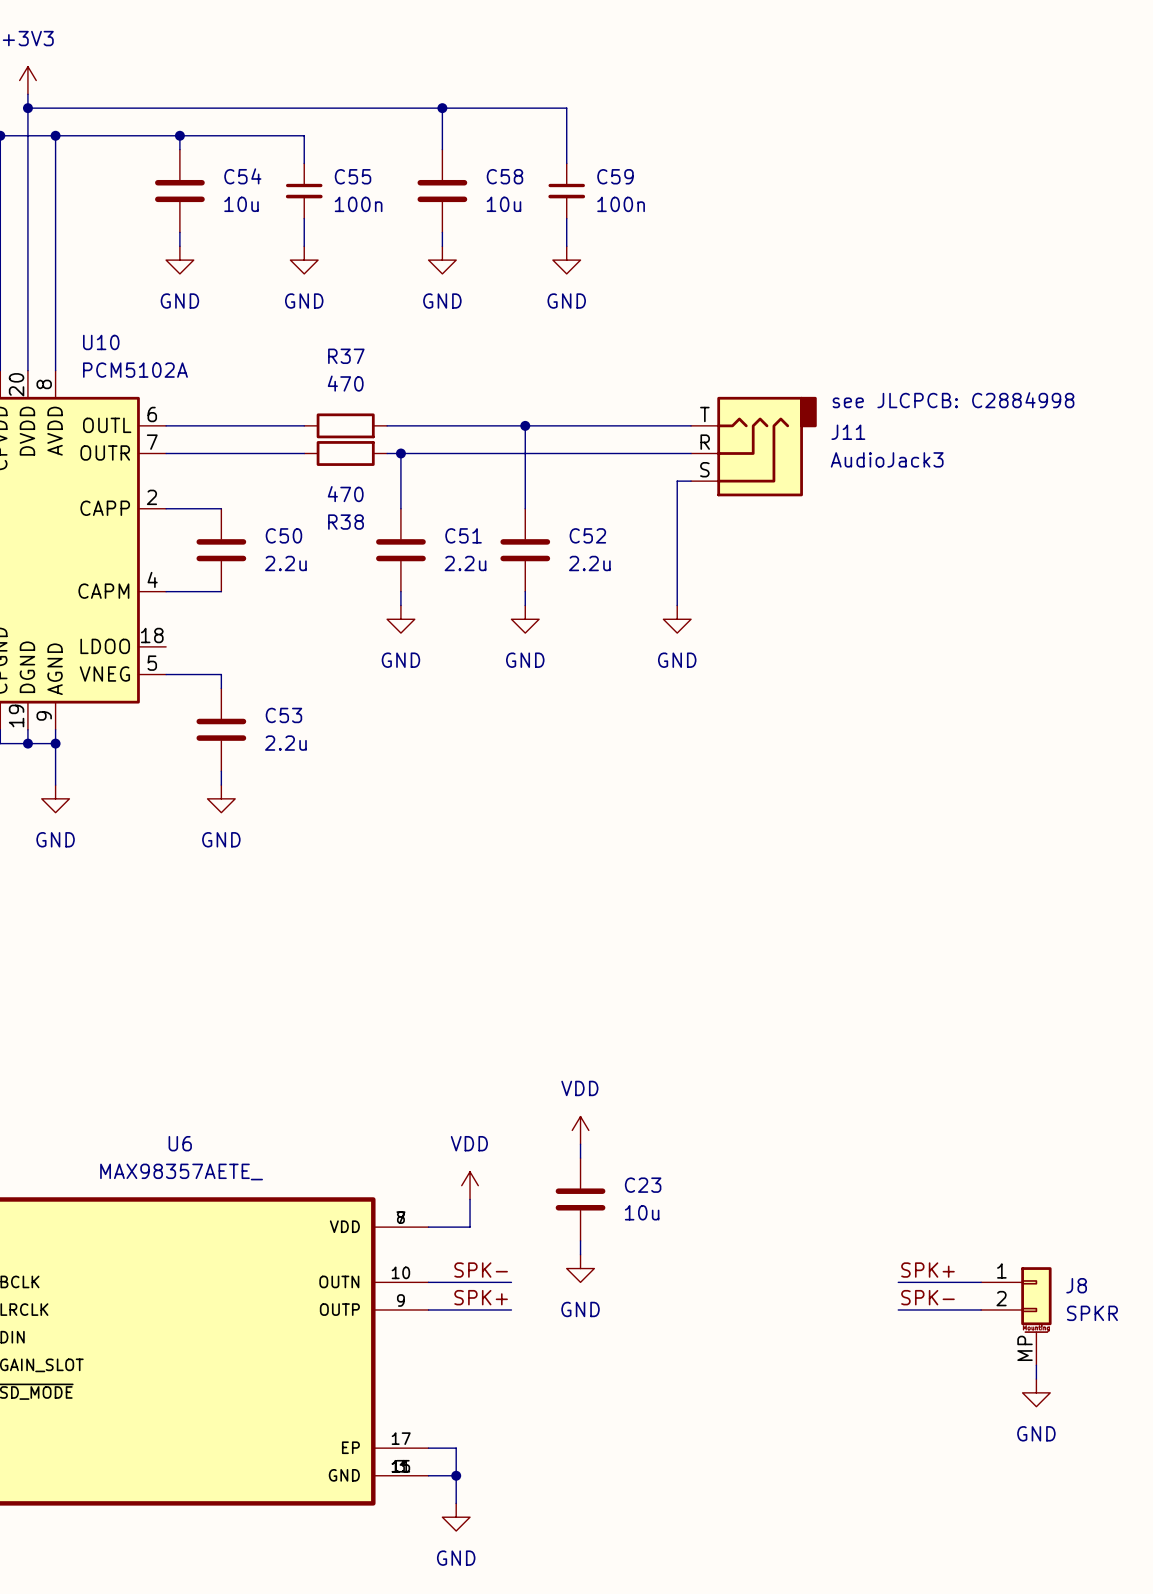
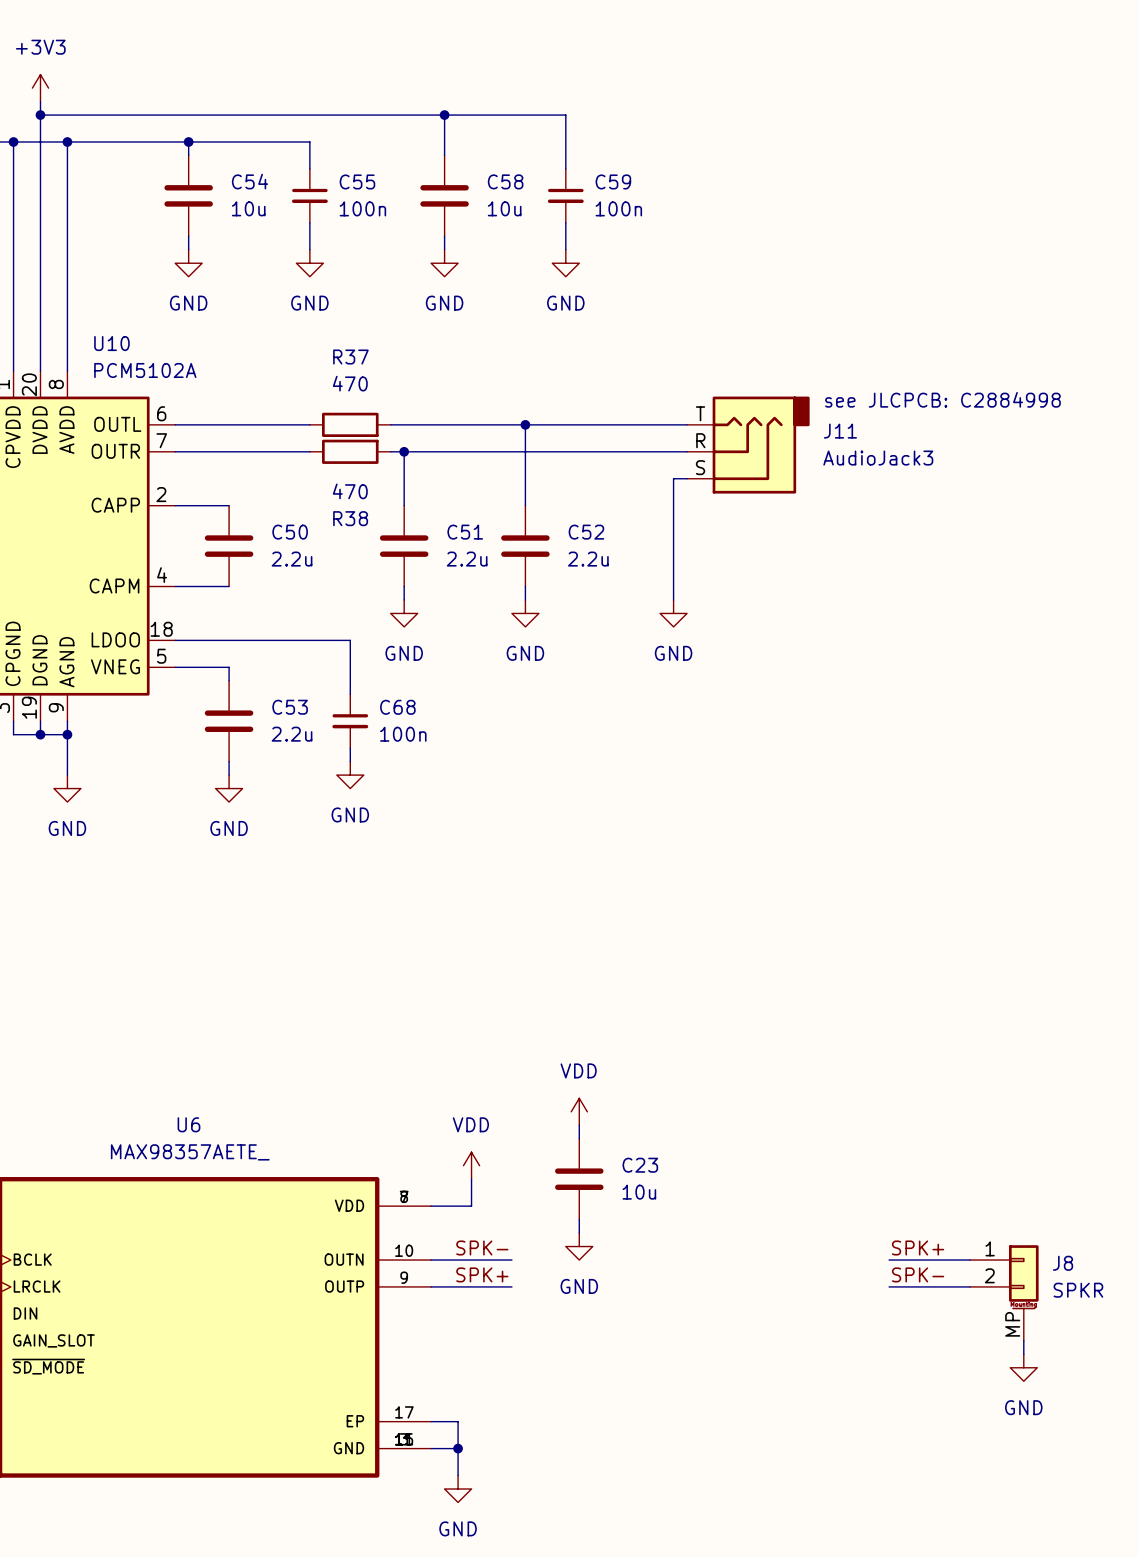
wire: none -> (175, 640) (350, 640) (350, 694)
C68: none -> 100n (350, 721)
wire: none -> (350, 748) (350, 761)
power symbol: none -> GND (350, 775)

